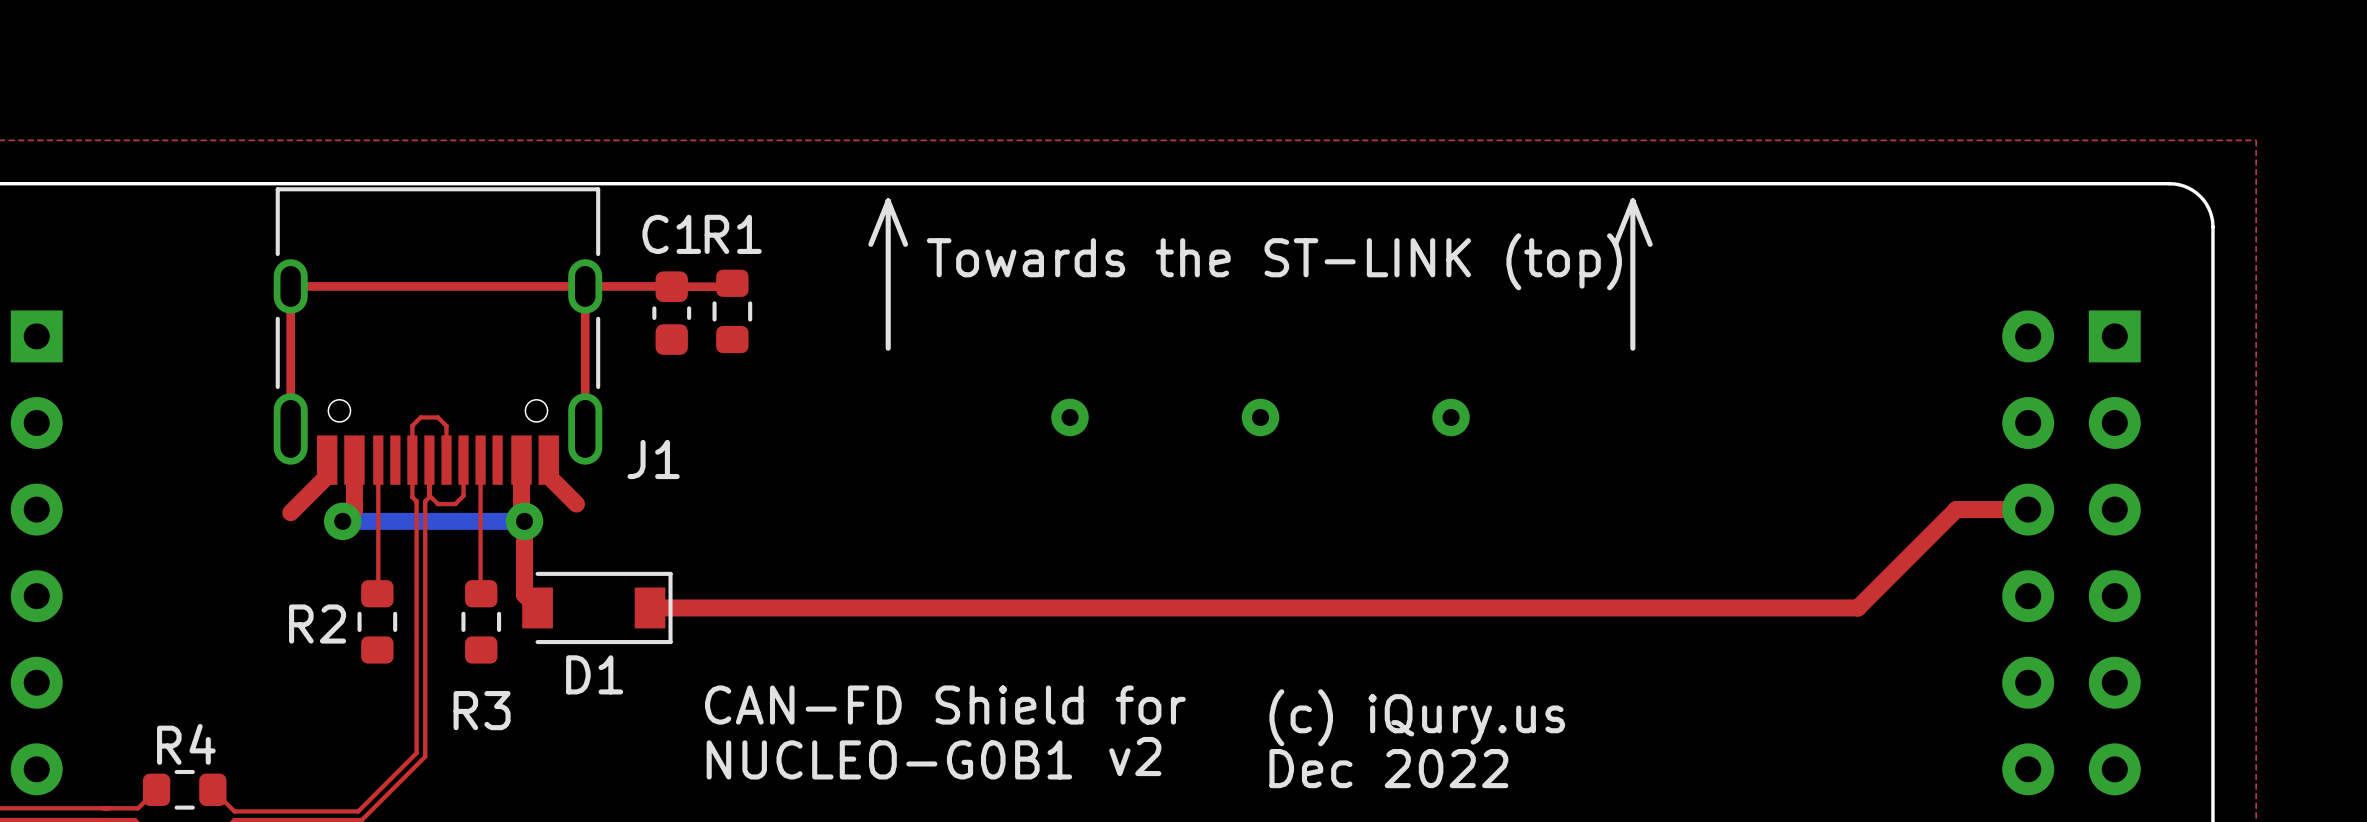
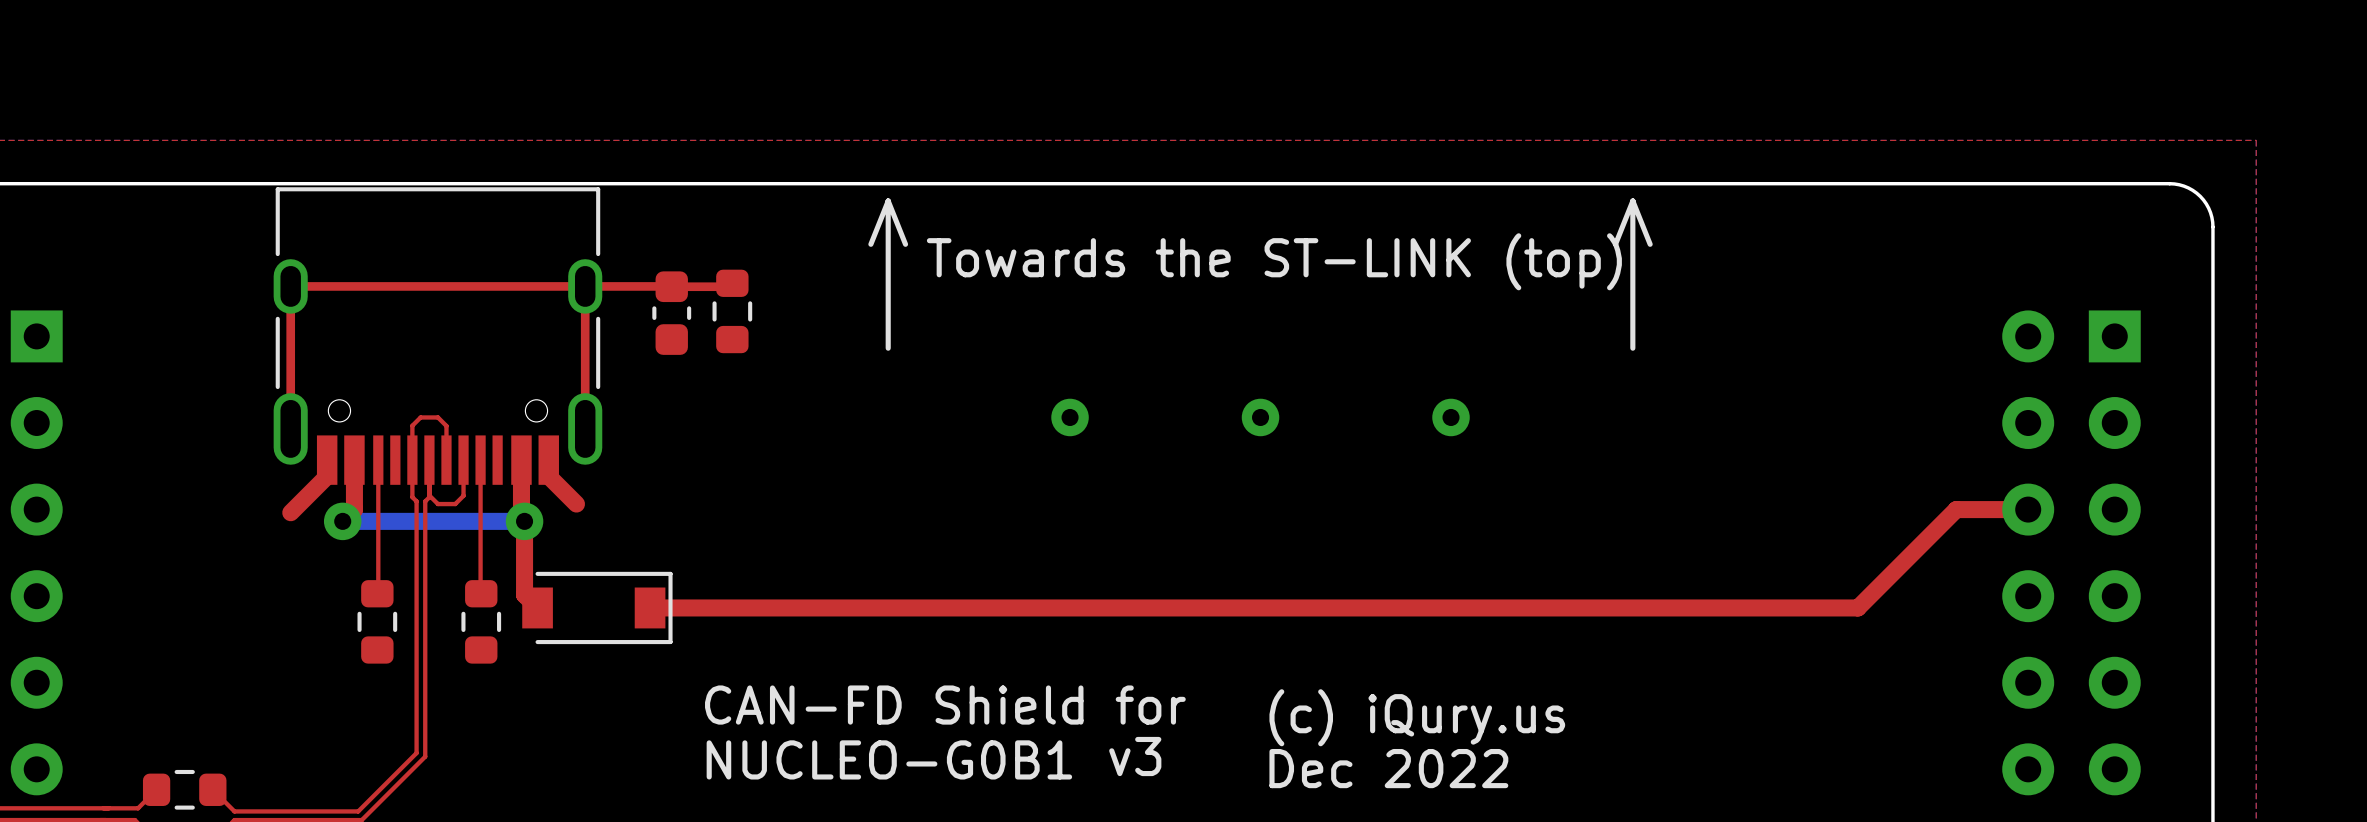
C1 name: C1 (671, 234) -> none
R1 name: R1 (733, 234) -> none
J1 name: J1 (653, 459) -> none
R2 name: R2 (317, 624) -> none
D1 name: D1 (594, 674) -> none
R3 name: R3 (482, 710) -> none
R4 name: R4 (186, 744) -> none
text: v2 (1135, 756) -> v3 (1135, 756)

